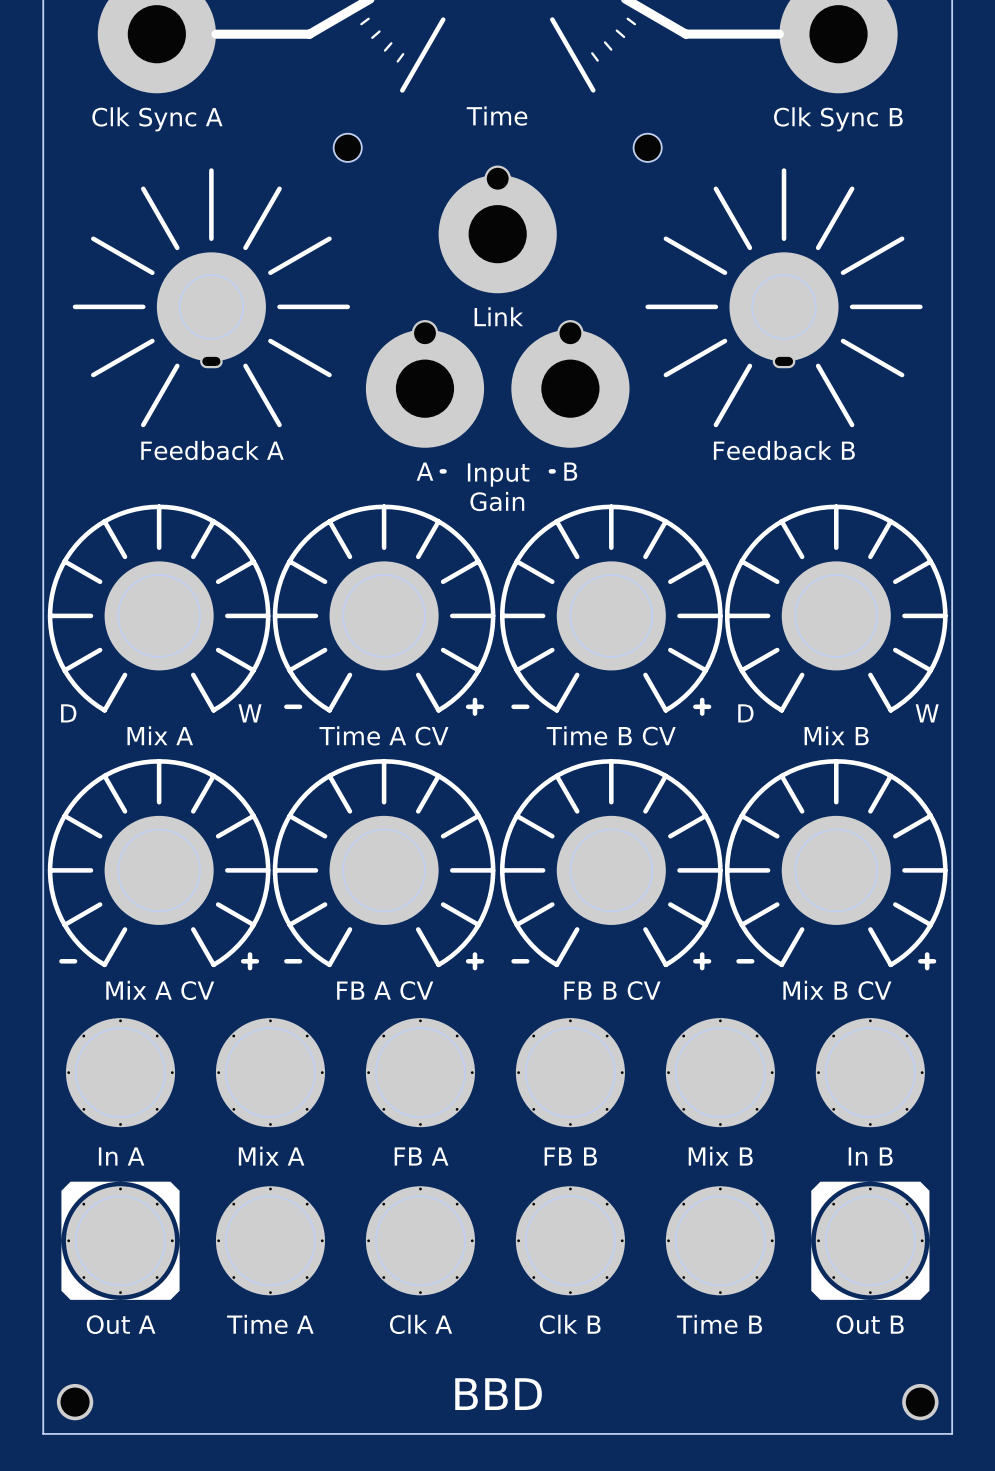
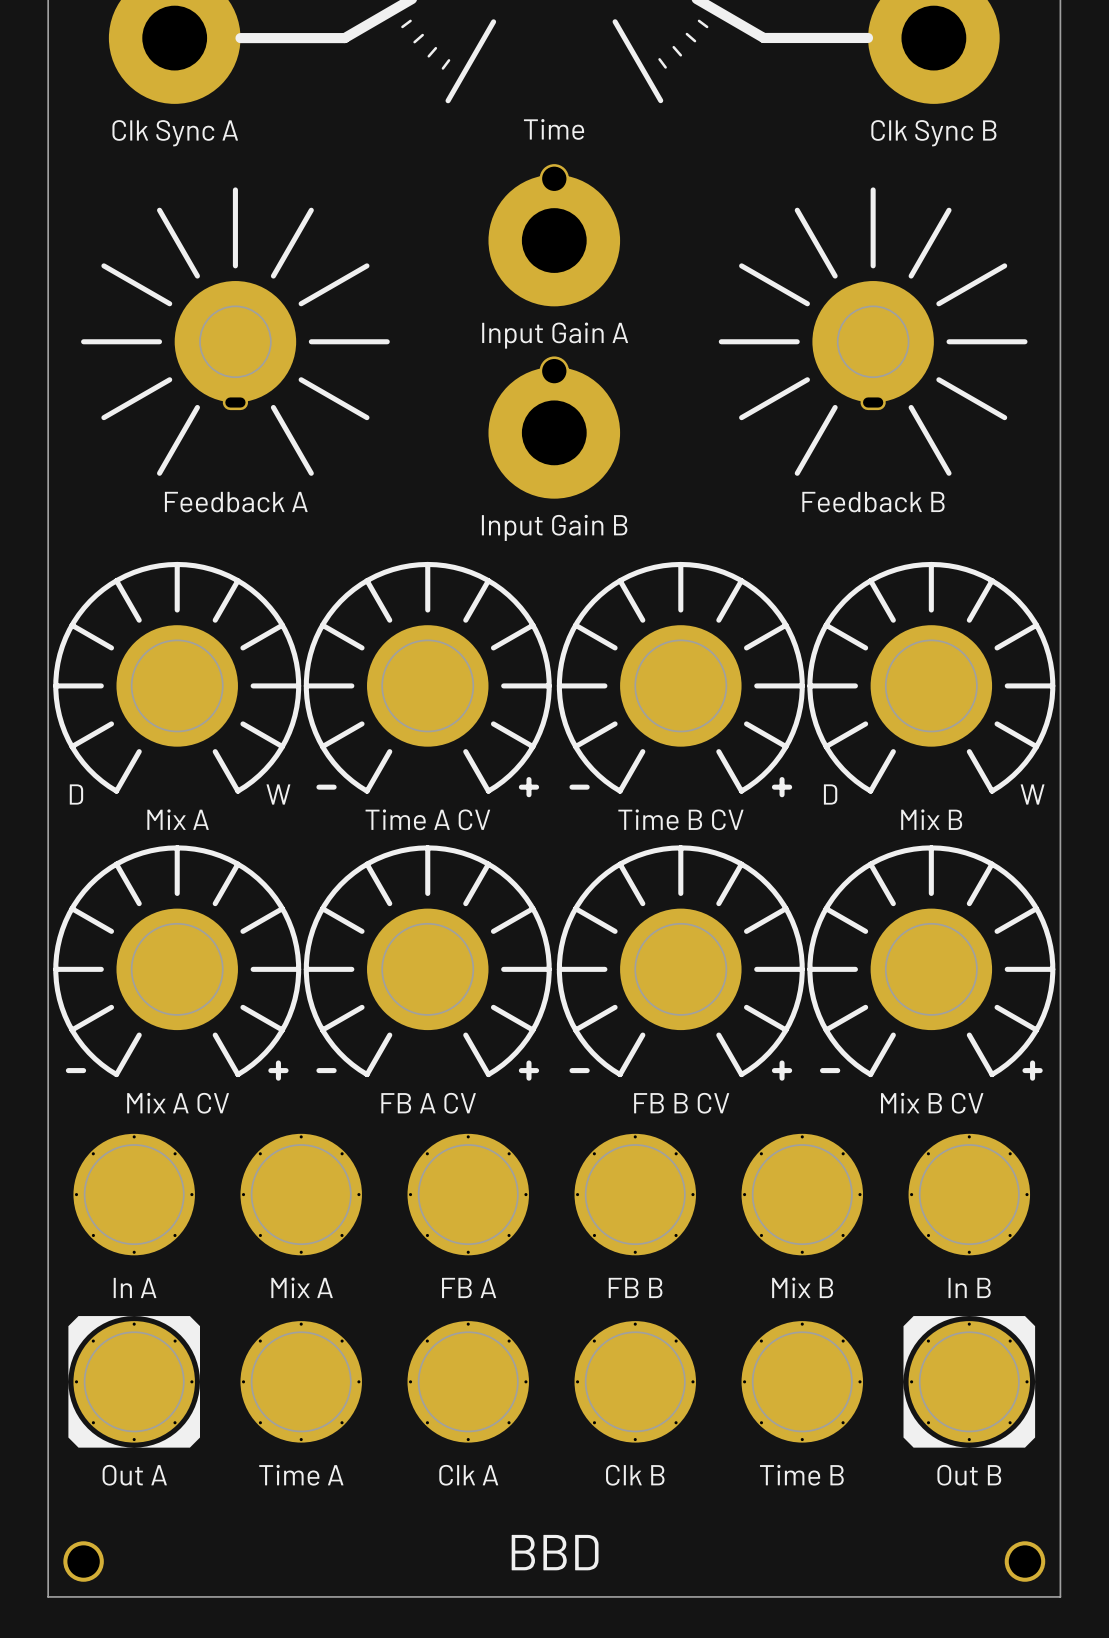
part: (347, 147) -> none
part: (647, 147) -> none
part: none -> Input Gain A (554, 235)
part: Link (497, 229) -> none
part: A (424, 383) -> none
part: none -> Input Gain B (554, 427)
part: B (570, 383) -> none
line: (441, 471) (444, 471) -> none
line: (550, 471) (553, 471) -> none
text: Input (498, 475) -> none
text: Gain (497, 501) -> none

